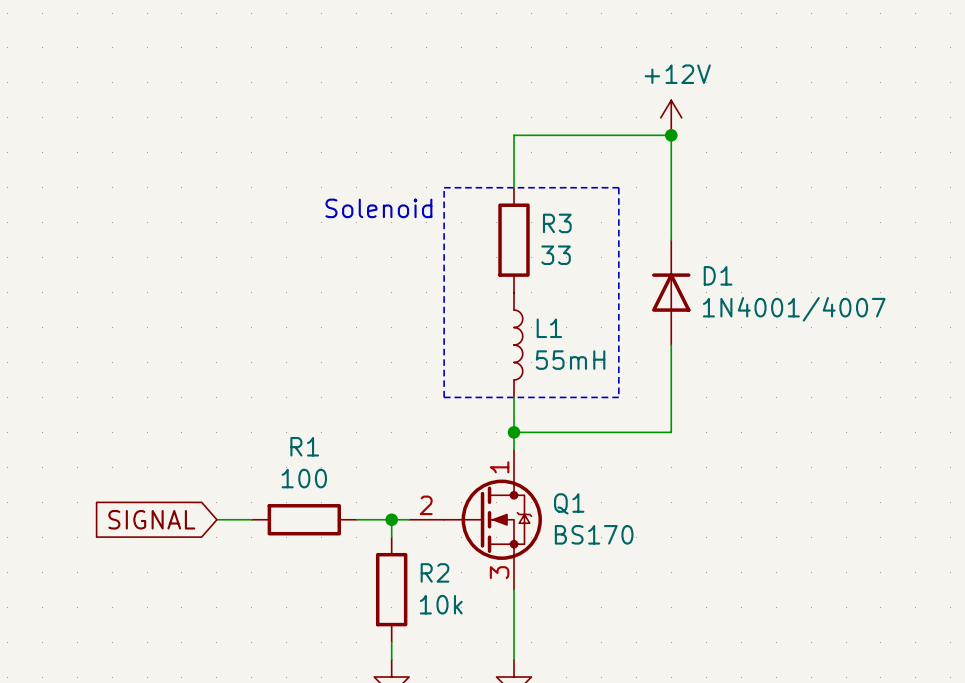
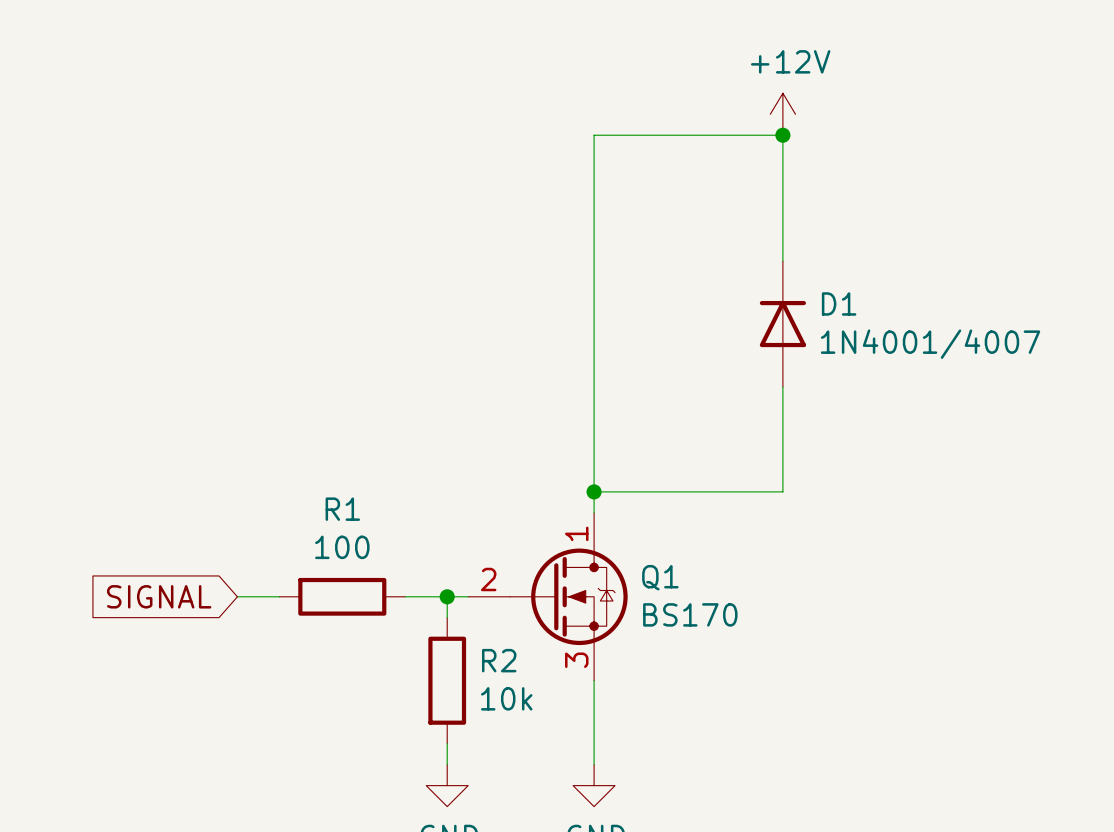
line: (444, 187) (618, 187) (618, 397) (444, 397) (444, 187) -> none
wire: none -> (594, 198) (594, 449)
text: Solenoid (378, 208) -> none
R3: 33 (514, 240) -> none
L1: 55mH (518, 345) -> none

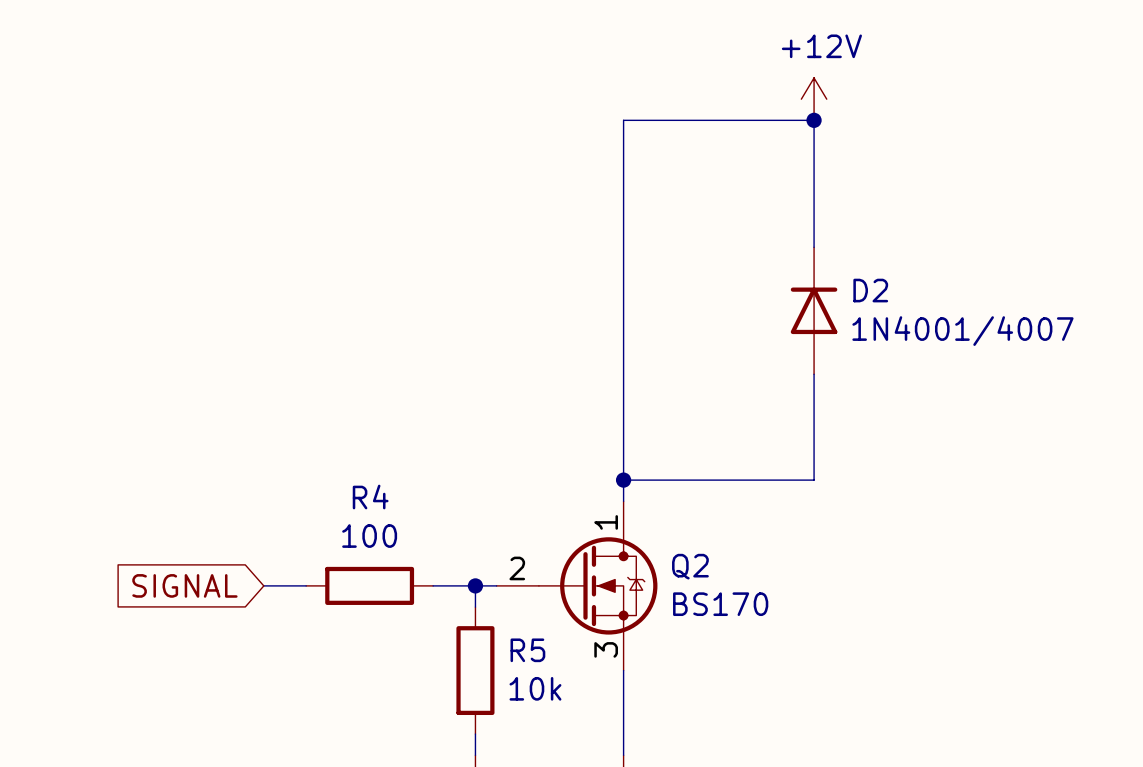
D1 name: D1 (839, 303) -> D2 (870, 290)
R1 name: R1 (342, 509) -> R4 (370, 497)
Q1 name: Q1 (660, 577) -> Q2 (690, 566)
R2 name: R2 (499, 660) -> R5 (527, 650)

